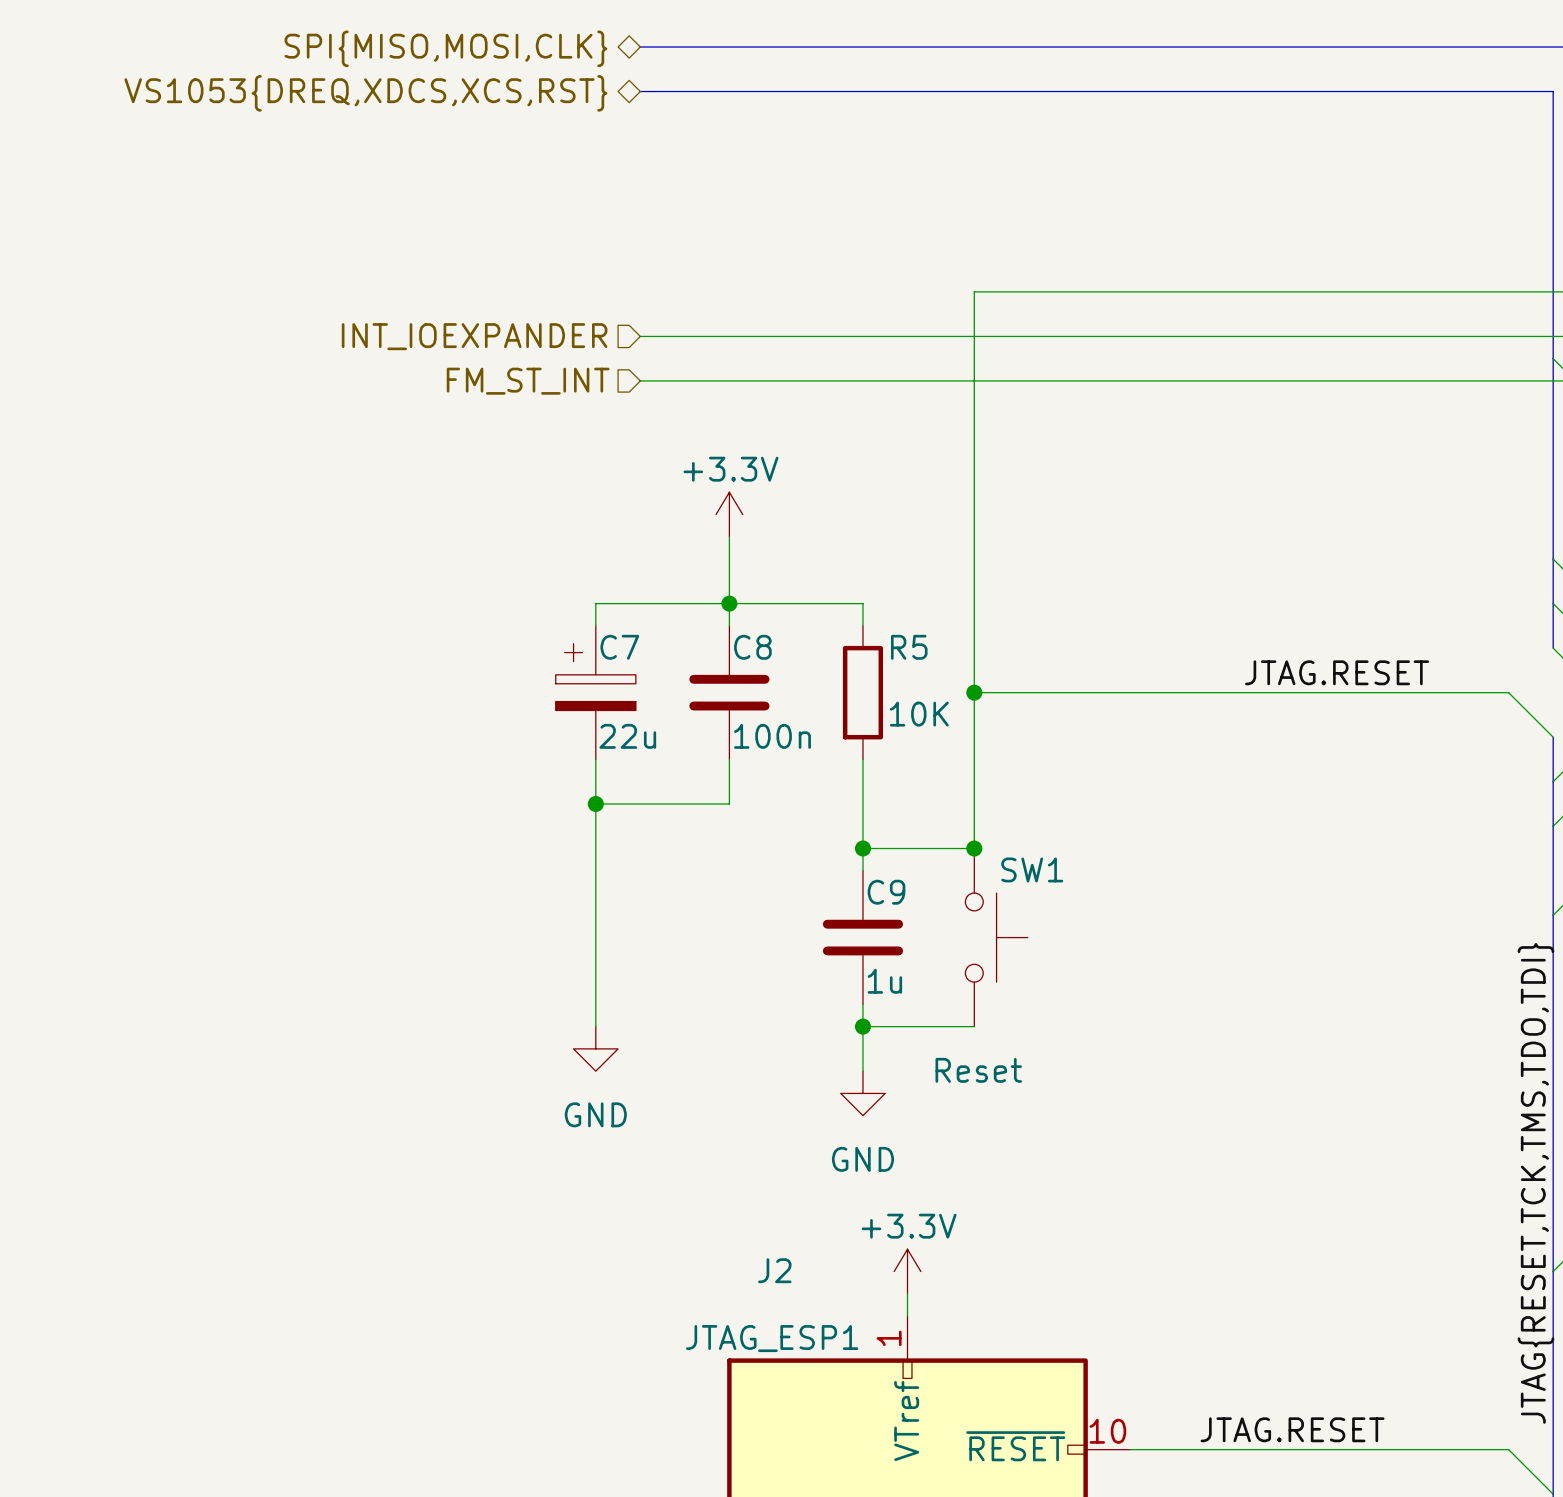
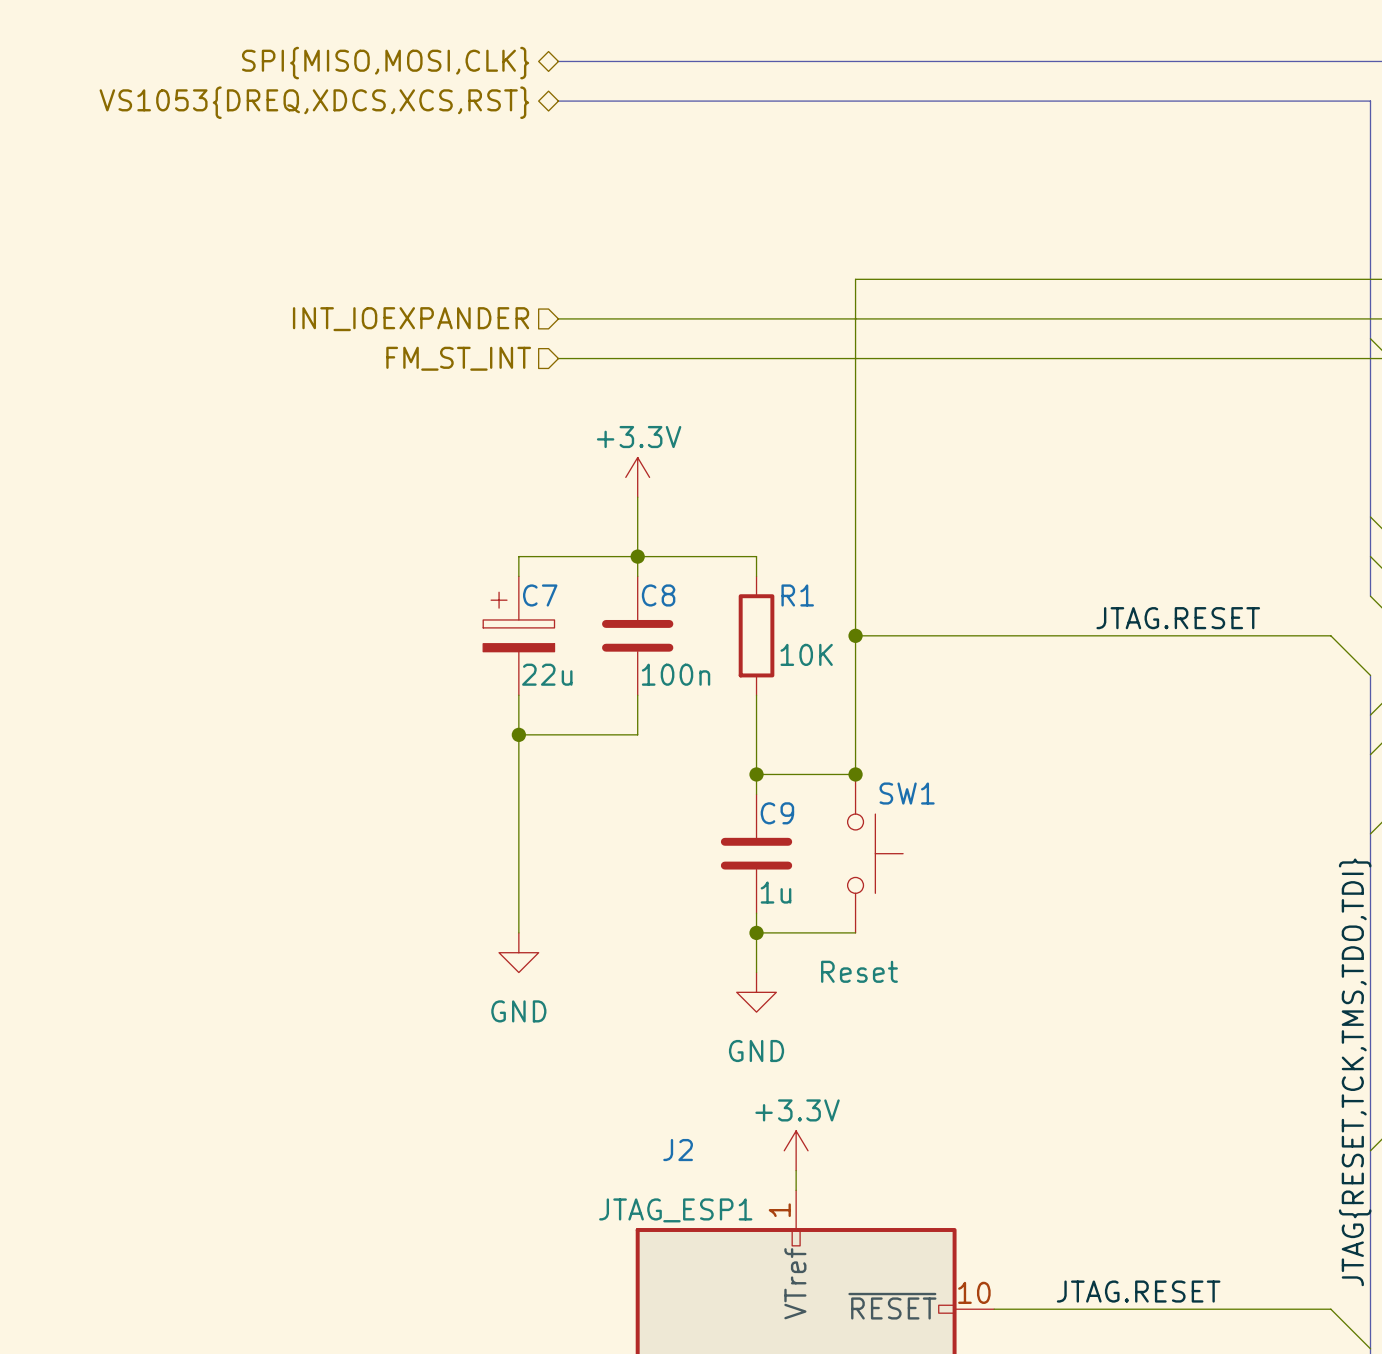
R5 name: R5 (909, 647) -> R1 (797, 595)

